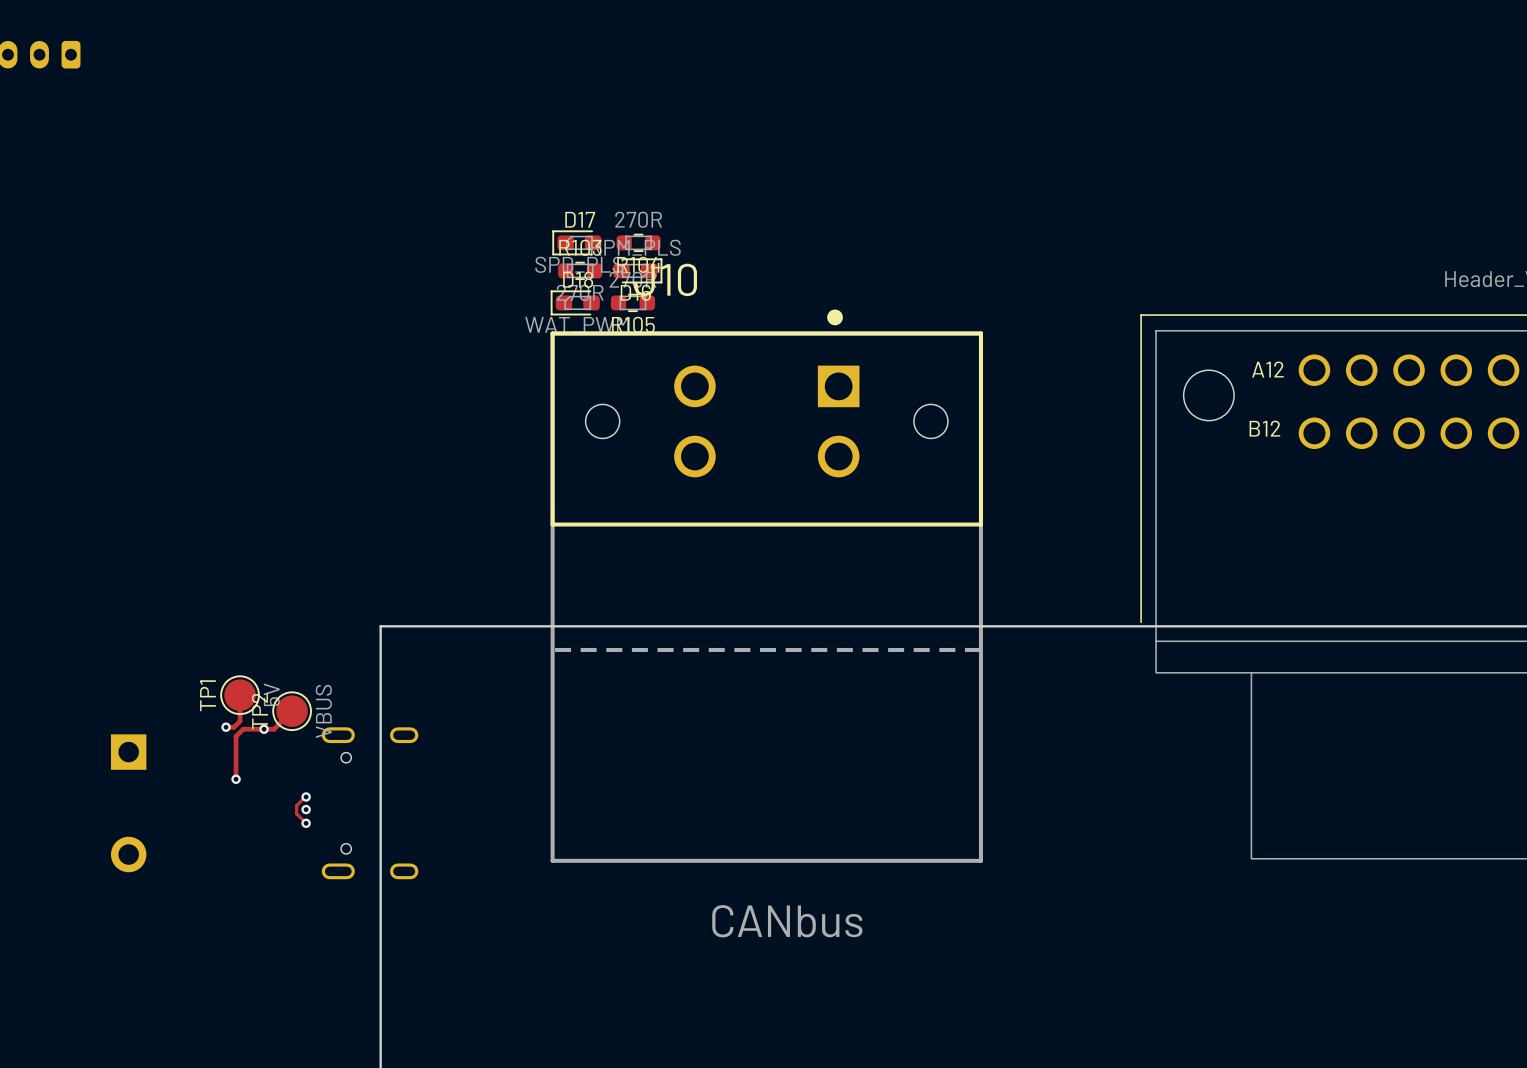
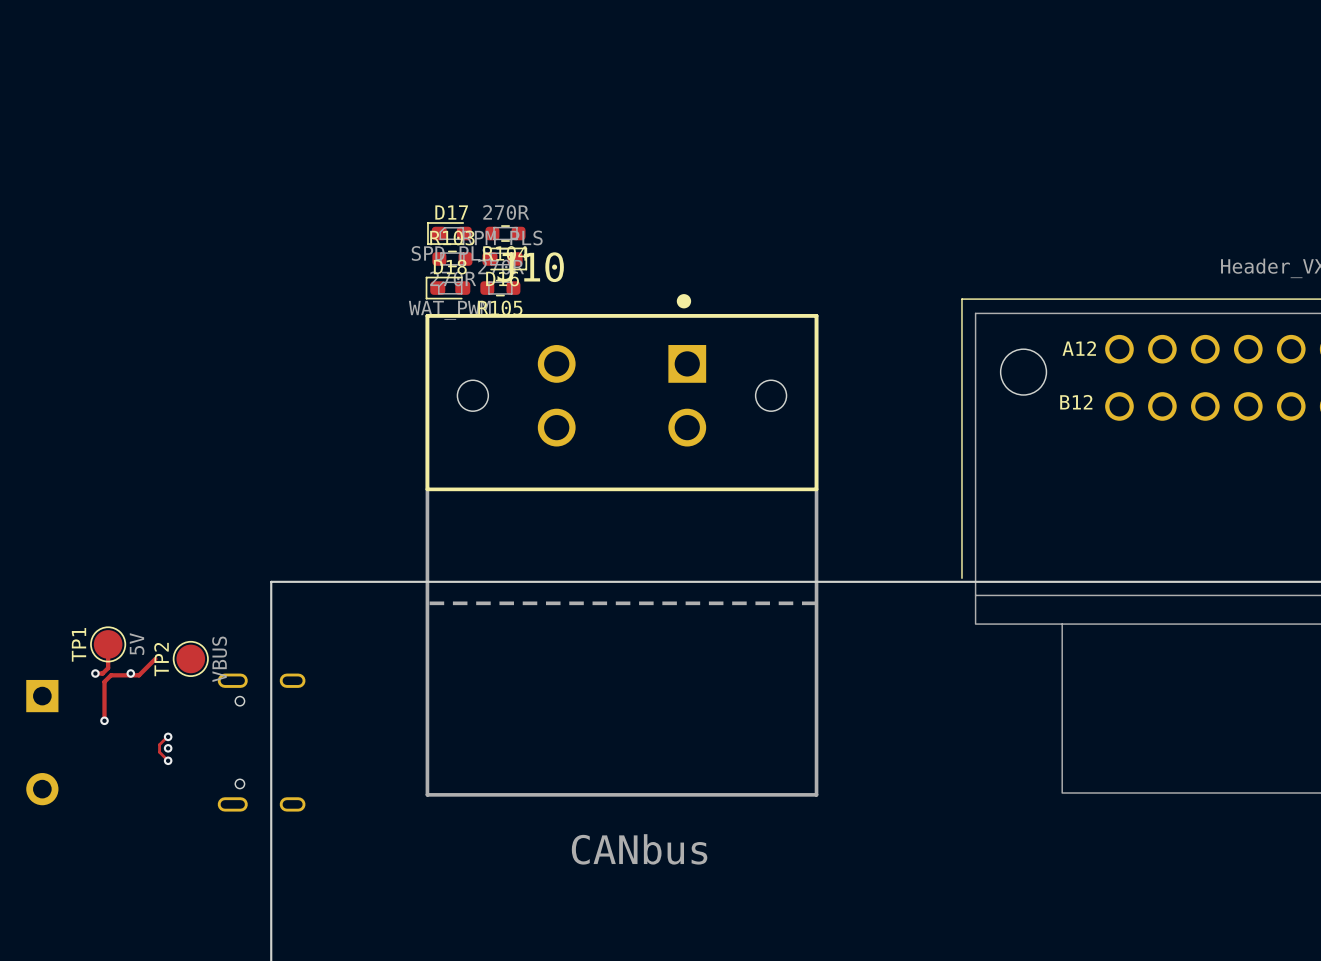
track: (240, 695) (240, 721) (234, 727) (226, 727) -> (108, 644) (108, 668) (102, 673) (95, 673)
TP1 position: (240, 695) -> (108, 644)
track: (292, 711) (274, 729) (243, 729) (236, 736) (236, 779) -> (155, 658) (139, 675) (111, 675) (104, 681) (104, 720)
via: none -> (95, 673)
via: (264, 729) -> none
via: none -> (104, 720)
via: (236, 779) -> none
track: (306, 796) (296, 805) (296, 813) (306, 823) -> (168, 736) (159, 744) (159, 752) (168, 760)
via: (306, 796) -> none
via: none -> (168, 736)
via: none -> (168, 748)
via: (306, 809) -> none
via: none -> (168, 760)
via: (306, 823) -> none

